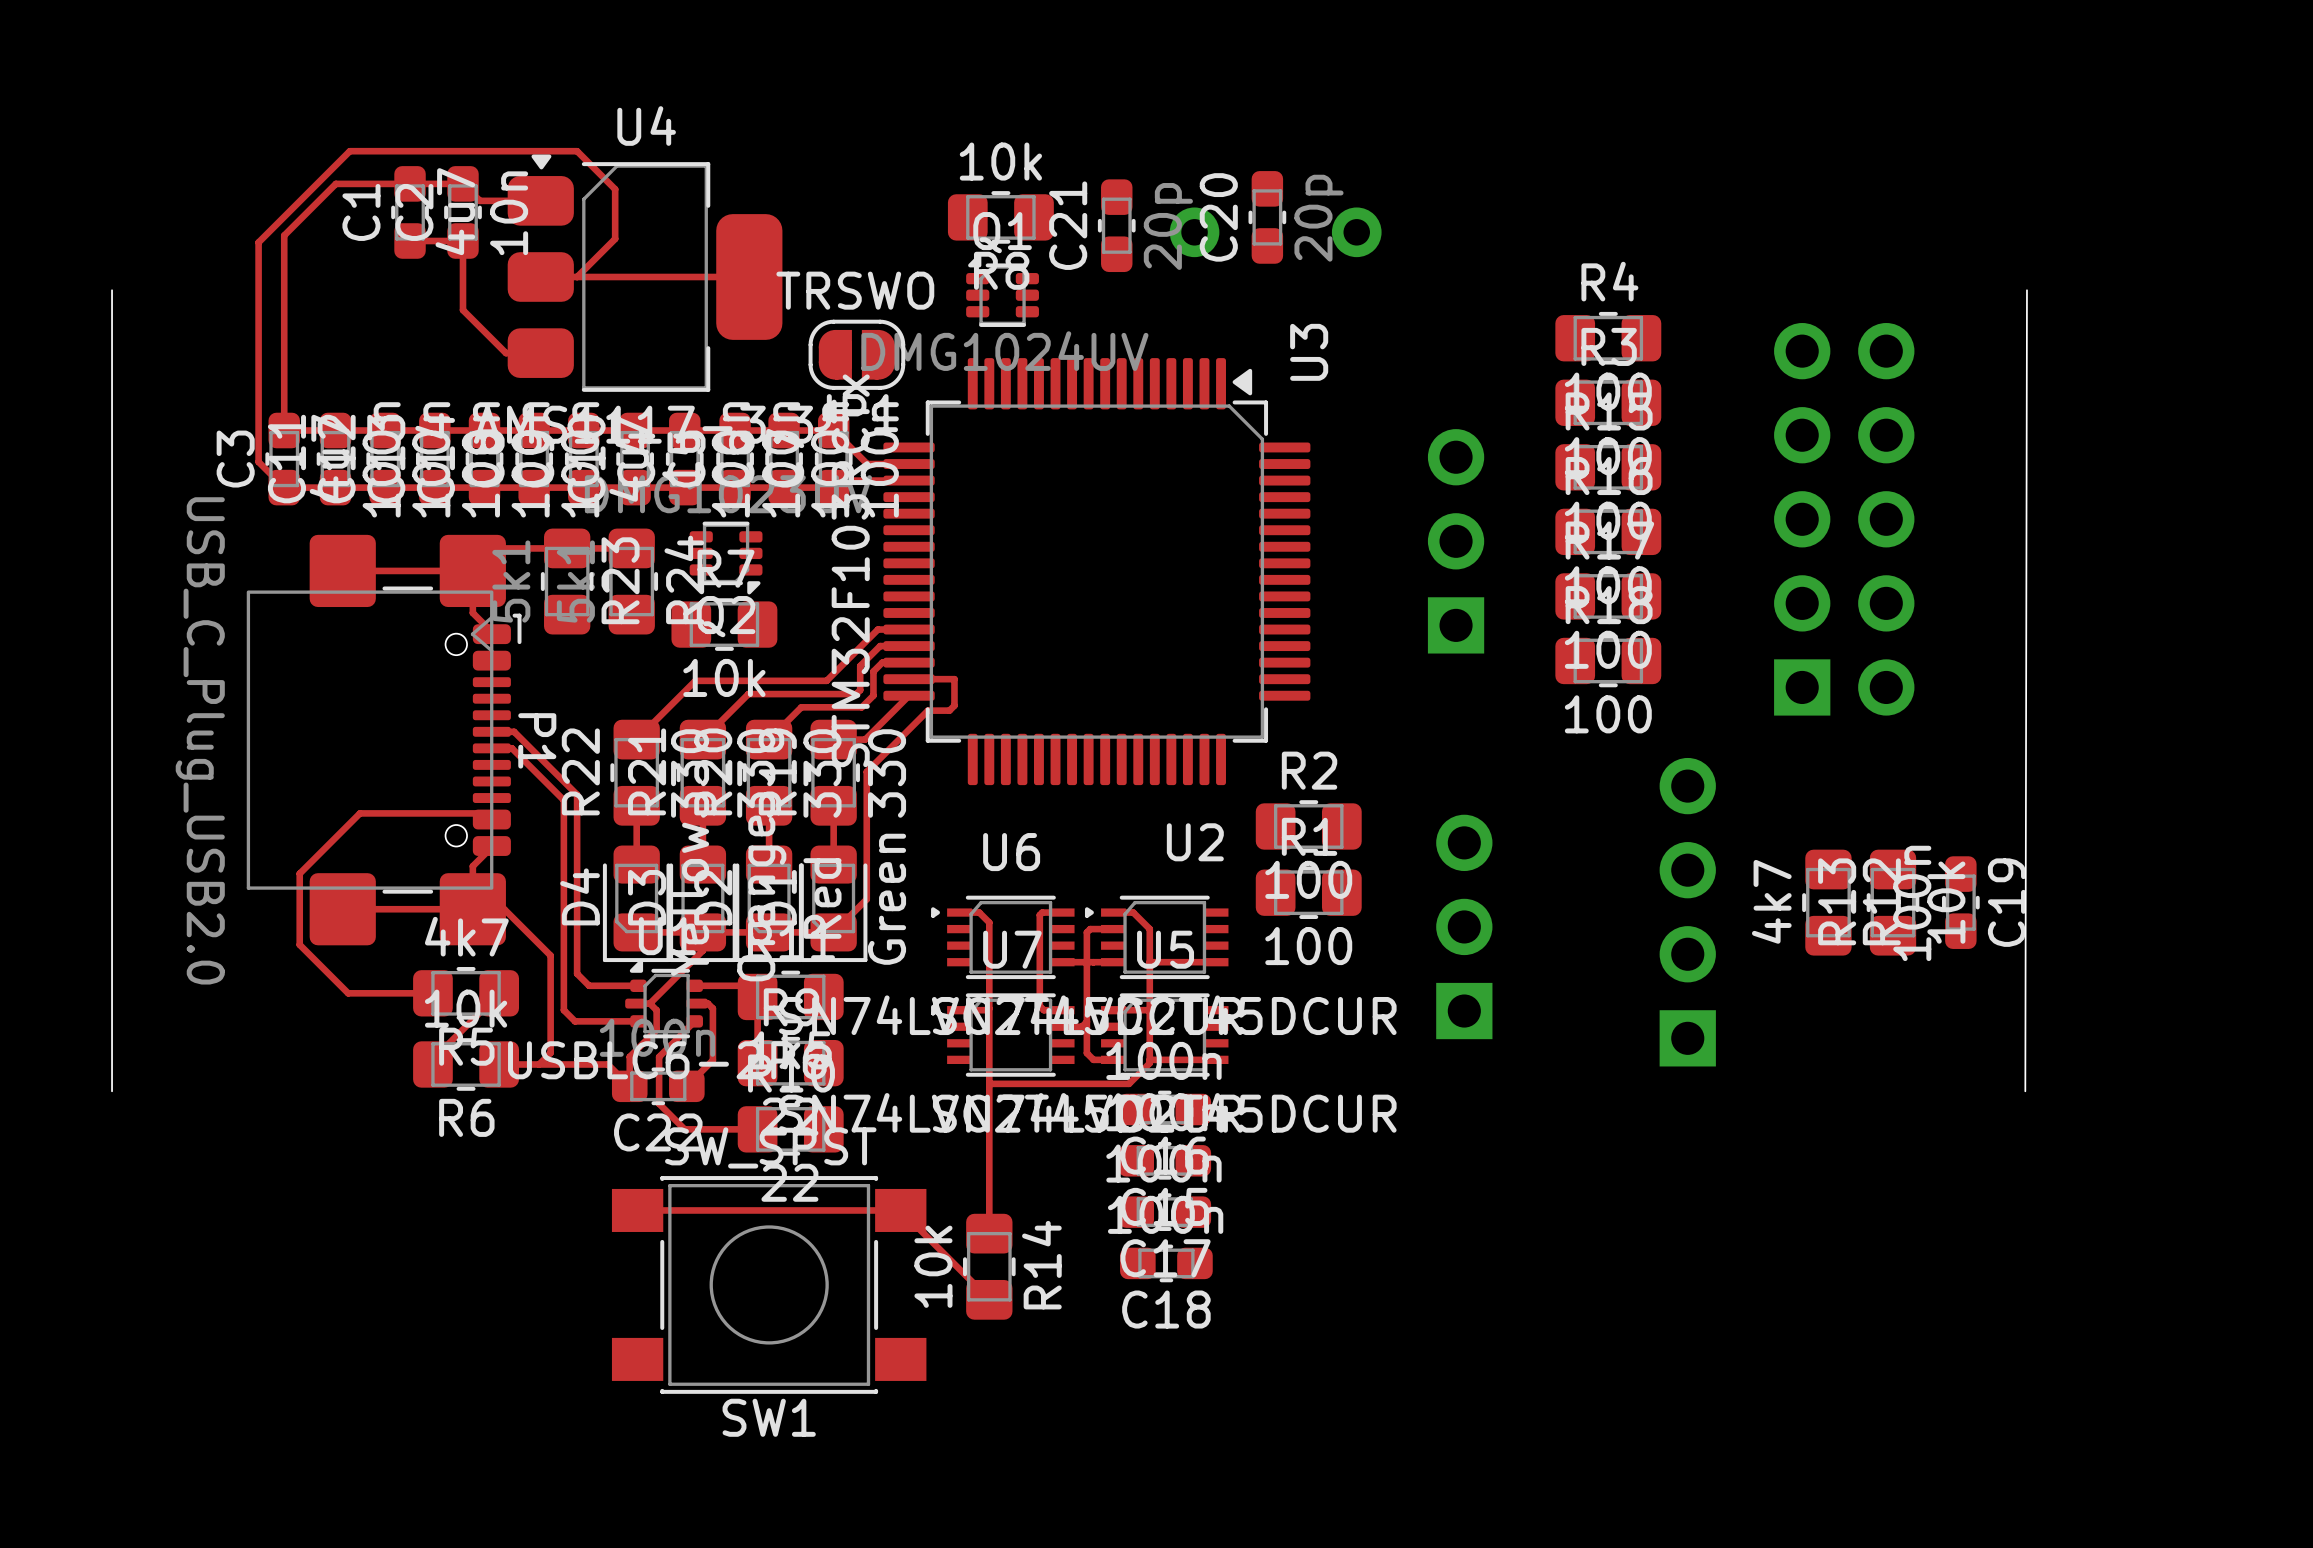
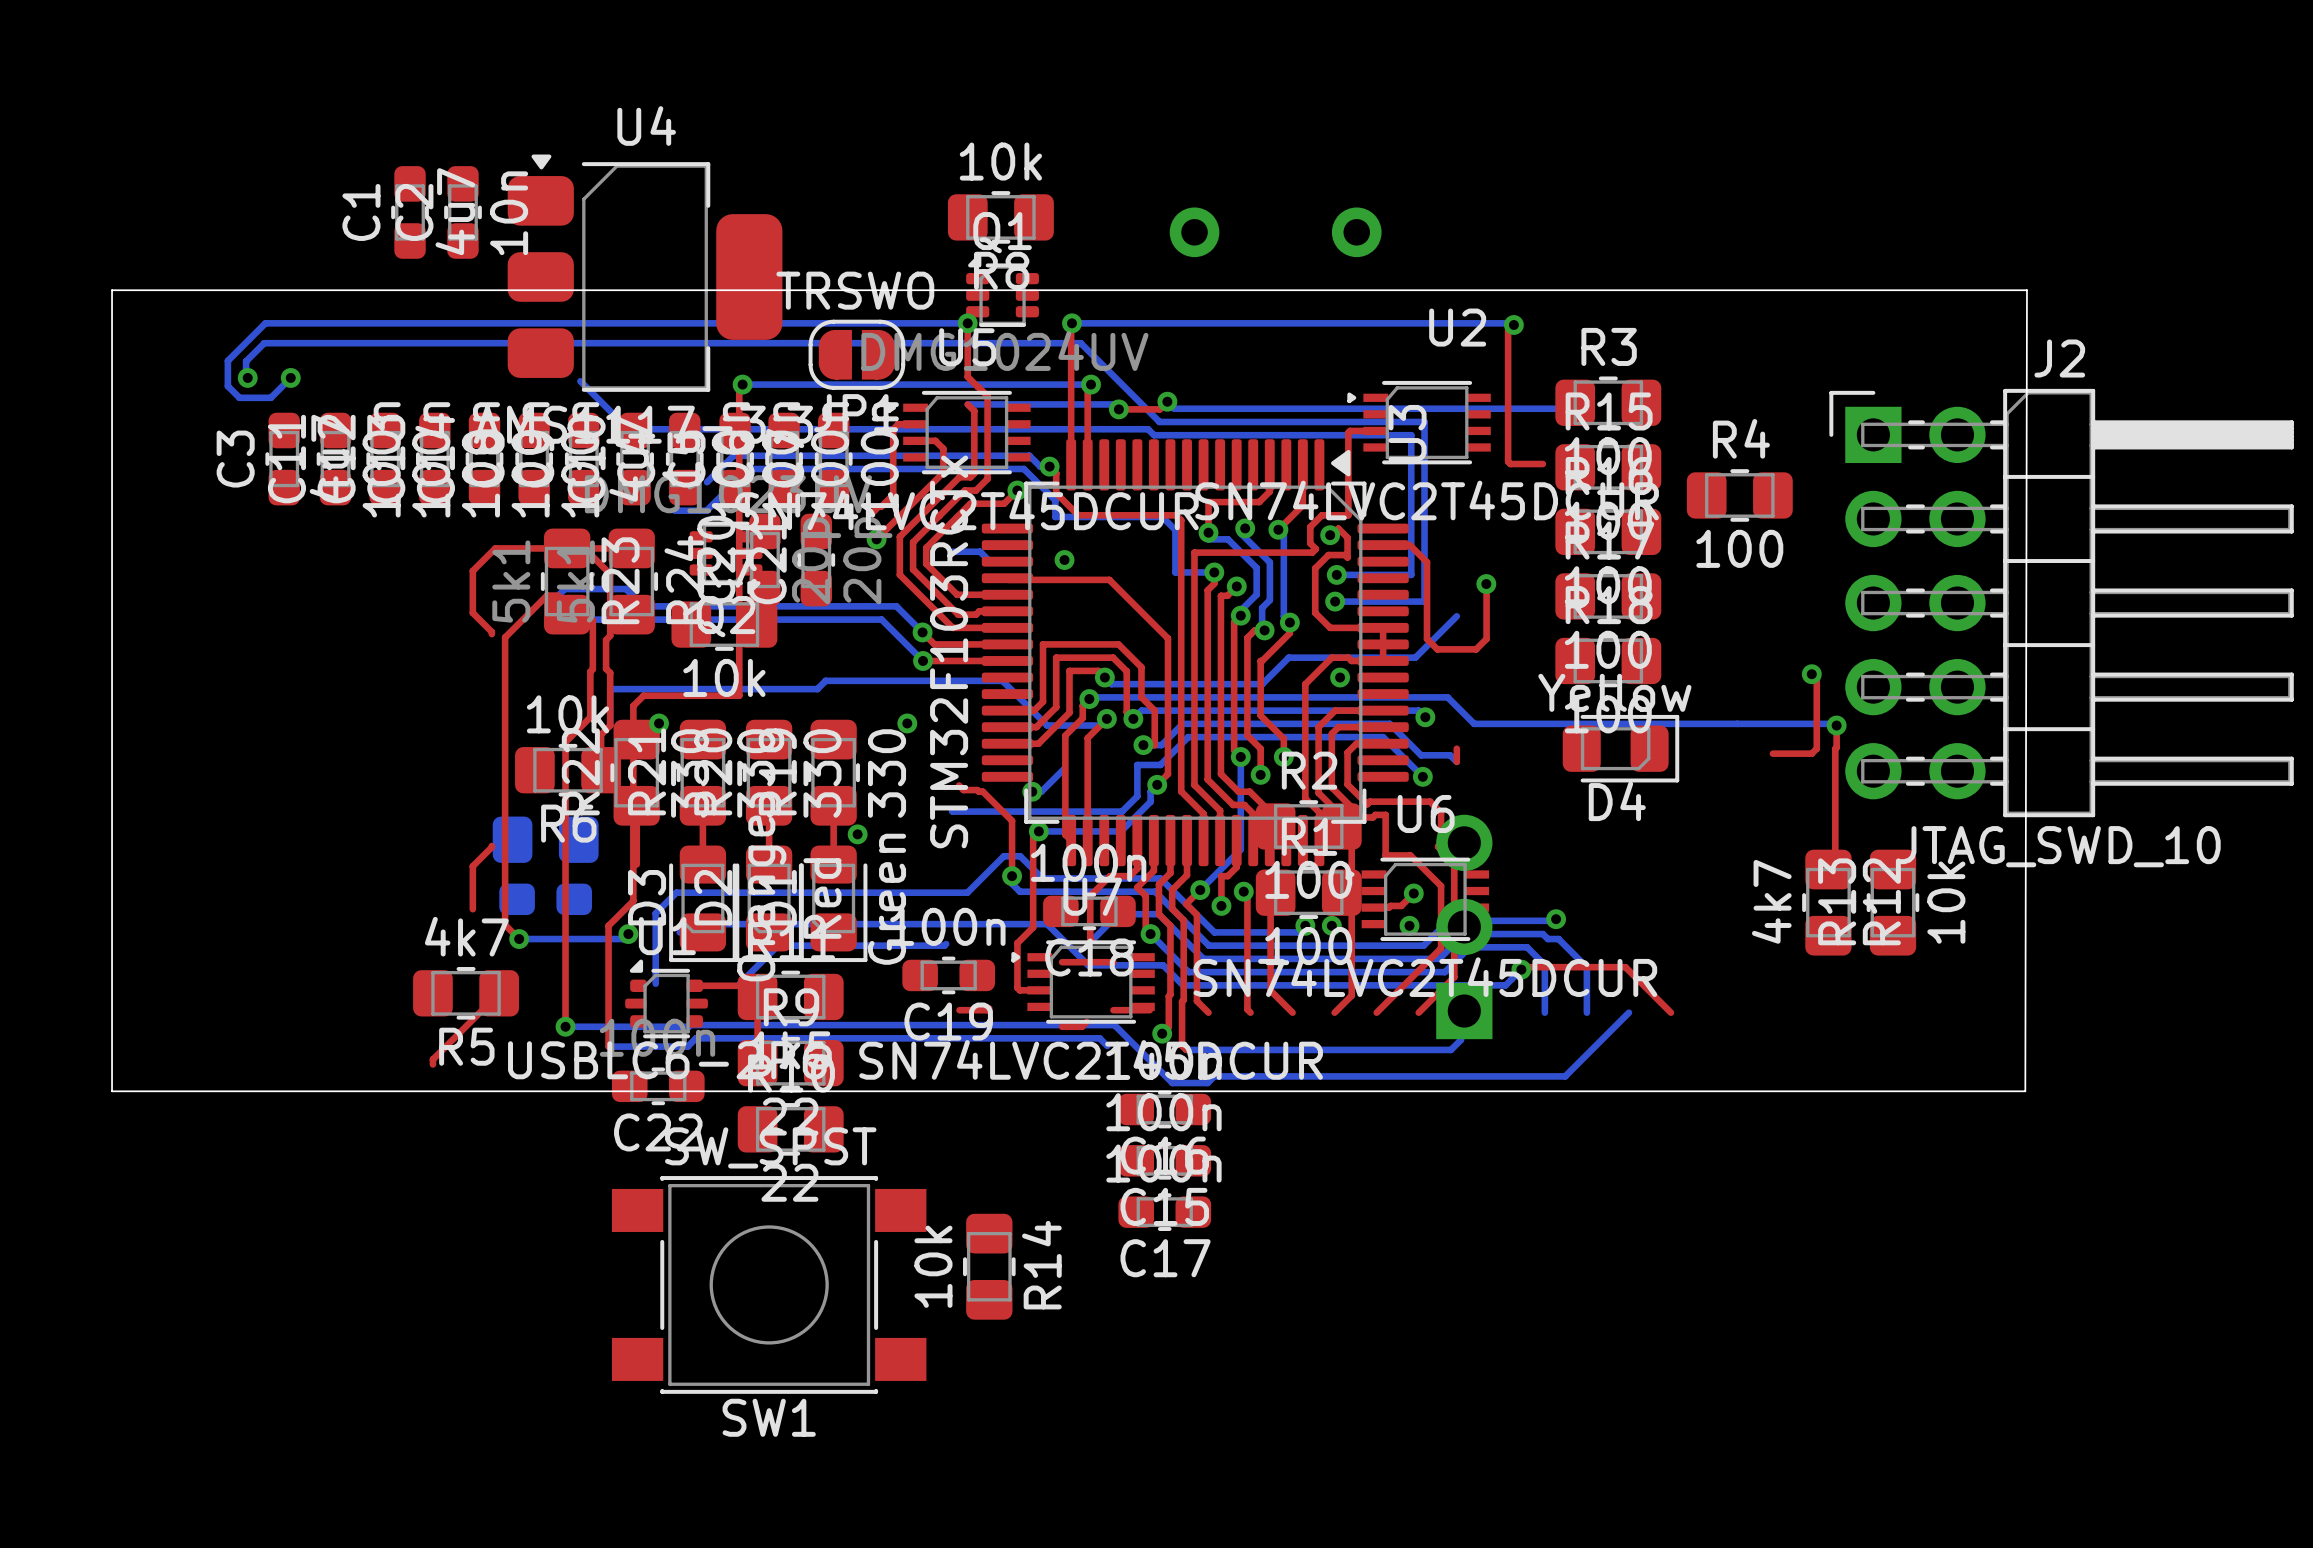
top track: (540, 200) (479, 200) (462, 183) (335, 183) (284, 235) (284, 430) (833, 430) (867, 464) (909, 464) -> none
C20 position: (1267, 217) -> (764, 560)
C21 position: (1116, 225) -> (816, 560)
top track: (410, 240) (462, 240) (462, 310) (505, 353) (540, 353) -> none
top track: (540, 276) (749, 276) -> none
top track: (577, 276) (615, 238) (615, 189) (577, 151) (349, 151) (258, 242) (258, 461) (284, 487) (833, 487) (840, 480) (909, 480) -> none
board edge: none -> (112, 290) (2026, 290)
top track: none -> (967, 323) (967, 376) (977, 387)
bottom track: none -> (967, 323) (265, 323) (227, 360) (227, 386) (239, 397) (270, 397) (290, 377)
via: none -> (967, 323)
top track: none -> (1071, 323) (1071, 464)
bottom track: none -> (1071, 323) (1512, 323) (1513, 324)
via: none -> (1071, 323)
top track: none -> (1513, 324) (1508, 330) (1508, 461) (1510, 464) (1542, 464)
via: none -> (1513, 324)
R4 position: (1608, 338) -> (1739, 495)
bottom track: none -> (247, 377) (246, 361) (264, 343) (1080, 343) (1159, 421) (1424, 421) (1424, 601) (1335, 601)
via: none -> (247, 377)
via: none -> (290, 377)
bottom track: none -> (580, 381) (628, 429) (1148, 429) (1154, 435) (1411, 435) (1411, 574) (1336, 574)
top track: none -> (742, 384) (739, 387) (739, 695) (643, 695) (633, 705) (633, 901) (608, 925) (608, 1046)
bottom track: none -> (742, 384) (1091, 384)
via: none -> (742, 384)
top track: none -> (1091, 384) (1087, 387) (1087, 464)
via: none -> (1091, 384)
top track: none -> (978, 387) (987, 396) (987, 478) (975, 490) (964, 490) (913, 542) (913, 569) (958, 614) (975, 614) (979, 611) (1007, 611)
top track: none -> (1167, 401) (1159, 409) (1118, 409)
bottom track: none -> (1167, 401) (1174, 408) (1587, 408)
via: none -> (1167, 401)
top track: none -> (967, 404) (974, 411) (974, 473) (970, 477) (959, 477) (899, 536) (899, 574) (952, 627) (1007, 627)
bottom track: none -> (967, 404) (1113, 404) (1118, 409)
via: none -> (1118, 409)
top track: none -> (915, 424) (898, 424) (893, 429) (893, 494) (872, 513)
top track: none -> (1375, 430) (1350, 430) (1348, 432) (1348, 515) (1321, 515) (1310, 526) (1310, 543) (1315, 549) (1312, 552) (1194, 552) (1194, 785) (1220, 810) (1220, 840)
top track: none -> (915, 440) (935, 440) (943, 448) (943, 472) (876, 539)
top track: none -> (1269, 464) (1269, 491) (1259, 502) (1208, 502) (1208, 532)
top track: none -> (1302, 464) (1302, 505) (1278, 529)
top track: none -> (1049, 466) (1056, 473) (1056, 493) (1078, 515) (1176, 515) (1181, 520) (1181, 791) (1203, 813) (1203, 840)
bottom track: none -> (1049, 466) (1040, 466) (1029, 455) (733, 455) (707, 482)
via: none -> (1049, 466)
top track: none -> (1017, 490) (1004, 503) (970, 503) (926, 547) (926, 563) (957, 594) (1007, 594)
via: none -> (1017, 490)
bottom track: none -> (674, 510) (706, 510) (748, 468) (1023, 468) (1055, 500) (1055, 516) (1162, 516) (1175, 530) (1175, 572) (1214, 572)
J2 side: bottom (1844, 519) -> top (2061, 603)
bottom track: none -> (1245, 528) (1240, 533) (1269, 562) (1269, 600) (1262, 607) (1262, 627) (1264, 630)
via: none -> (1245, 528)
bottom track: none -> (1278, 529) (1283, 535) (1283, 616) (1289, 622)
via: none -> (1278, 529)
bottom track: none -> (1208, 532) (1208, 539) (1228, 539) (1256, 567) (1256, 594) (1240, 610) (1240, 615)
via: none -> (1208, 532)
top track: none -> (1330, 535) (1338, 528) (1347, 537) (1347, 557) (1345, 555) (1328, 555) (1315, 568) (1315, 612) (1330, 627) (1383, 627) (1383, 660) (1351, 660) (1348, 657) (1331, 657) (1305, 684) (1305, 798) (1319, 812) (1319, 840)
via: none -> (1330, 535)
via: none -> (876, 539)
part: (1456, 541) -> none
top track: none -> (1383, 545) (1409, 545) (1427, 562) (1427, 638) (1437, 649) (1476, 649) (1486, 638) (1486, 584)
top track: none -> (582, 546) (610, 574) (610, 635) (606, 639) (606, 668) (610, 672) (610, 725) (601, 734) (601, 770)
bottom track: none -> (952, 551) (980, 551) (988, 560)
via: none -> (1064, 560)
top track: (342, 570) (472, 570) -> none
U3 position: (1096, 571) -> (1195, 652)
top track: none -> (1214, 572) (1214, 583) (1207, 590) (1207, 779) (1233, 804) (1244, 804) (1253, 813) (1253, 840)
via: none -> (1214, 572)
via: none -> (1336, 574)
top track: none -> (1007, 578) (1009, 579) (1109, 579) (1167, 638) (1167, 774) (1157, 784)
via: none -> (1486, 584)
top track: none -> (1236, 586) (1227, 595) (1220, 595) (1220, 774) (1238, 791) (1249, 791) (1269, 811) (1269, 840)
via: none -> (1236, 586)
top track: none -> (558, 595) (547, 595) (505, 637) (505, 924) (519, 939)
bottom track: none -> (558, 595) (564, 589) (625, 589) (643, 606) (896, 606) (922, 632)
via: none -> (1335, 601)
top track: none -> (581, 608) (592, 620) (592, 669) (590, 671) (590, 717) (565, 742) (565, 1026)
bottom track: none -> (581, 608) (591, 619) (881, 619) (923, 660)
top track: none -> (1240, 615) (1234, 622) (1234, 750) (1240, 756)
via: none -> (1240, 615)
bottom track: none -> (1456, 616) (1415, 657) (1288, 657) (1262, 684) (1111, 684) (1104, 677)
top track: none -> (1289, 622) (1289, 633) (1260, 660) (1260, 715) (1283, 738) (1283, 756)
via: none -> (1289, 622)
top track: (909, 629) (877, 629) (826, 680) (695, 680) (636, 739) -> none
top track: none -> (1264, 630) (1254, 630) (1247, 637) (1247, 735) (1260, 748) (1260, 774)
via: none -> (1264, 630)
top track: none -> (922, 632) (934, 644) (1007, 644)
via: none -> (922, 632)
top track: (909, 646) (880, 646) (860, 666) (860, 690) (856, 694) (748, 694) (702, 739) -> none
top track: none -> (923, 660) (1007, 660)
via: none -> (923, 660)
top track: (909, 662) (882, 662) (873, 671) (873, 695) (861, 707) (801, 707) (769, 739) -> none
top track: none -> (1811, 674) (1816, 679) (1816, 748) (1811, 753) (1772, 753)
via: none -> (1811, 674)
top track: none -> (1104, 677) (1098, 670) (1069, 670) (1069, 712) (1038, 743) (1007, 743)
via: none -> (1104, 677)
via: none -> (1340, 677)
top track: (909, 679) (954, 679) (954, 705) (949, 710) (927, 710) (866, 771) (866, 899) (833, 932) (636, 932) -> none
top track: (909, 695) (865, 739) (833, 739) -> none
top track: none -> (1089, 699) (1082, 705) (1082, 718) (1065, 735) (1065, 834) (1071, 840)
bottom track: none -> (1089, 699) (1091, 697) (1447, 697) (1474, 723) (1834, 723) (1836, 725)
via: none -> (1089, 699)
top track: none -> (1007, 710) (1034, 710) (1043, 701) (1043, 644) (1118, 644) (1141, 667) (1141, 697) (1154, 710) (1154, 744)
top track: none -> (1383, 710) (1335, 710) (1318, 727) (1318, 793) (1356, 831) (1351, 836) (1351, 995) (1334, 1012)
bottom track: none -> (1425, 717) (1418, 710) (1141, 710) (1133, 718)
via: none -> (1425, 717)
top track: none -> (1106, 718) (1087, 738) (1087, 840)
bottom track: none -> (1106, 718) (1100, 725) (1047, 725) (1002, 680) (825, 680) (817, 689) (610, 689) (610, 725)
via: none -> (1106, 718)
top track: none -> (1133, 718) (1126, 712) (1126, 671) (1113, 657) (1056, 657) (1056, 707) (1036, 727) (1007, 727)
via: none -> (1133, 718)
via: none -> (659, 723)
via: none -> (907, 723)
top track: none -> (1836, 725) (1835, 875) (1839, 879)
via: none -> (1836, 725)
top track: none -> (1383, 727) (1338, 727) (1331, 733) (1331, 787) (1361, 817) (1385, 814) (1385, 855) (1410, 855) (1441, 886) (1441, 948) (1376, 1012)
top track: (491, 731) (514, 731) (577, 794) (577, 973) (589, 985) (638, 985) -> none
P1: USB_C_Plug_USB2.0 (384, 740) -> none
top track: none -> (1383, 743) (1356, 743) (1347, 752) (1347, 784) (1367, 804) (1369, 801) (1430, 801) (1441, 812) (1441, 843) (1438, 846) (1454, 862) (1454, 977) (1418, 1012)
bottom track: none -> (1143, 745) (1161, 745) (1181, 723) (1389, 723) (1421, 755) (1450, 755) (1456, 761)
via: none -> (1143, 745)
top track: (491, 748) (511, 748) (563, 800) (563, 1010) (575, 1021) (638, 1021) -> none
top track: none -> (1456, 748) (1456, 761)
bottom track: none -> (1240, 756) (1240, 849) (1200, 890)
via: none -> (1240, 756)
via: none -> (1283, 756)
bottom track: none -> (1064, 768) (1041, 791) (1032, 791)
via: none -> (1260, 774)
bottom track: none -> (1422, 776) (1383, 737) (1188, 737) (1160, 764) (1137, 764) (1137, 796) (1122, 811) (952, 810)
via: none -> (1422, 776)
bottom track: none -> (1157, 784) (1150, 791) (1150, 801) (1120, 831) (1038, 831)
via: none -> (1157, 784)
top track: none -> (959, 785) (963, 790) (982, 791) (1012, 820) (1012, 876)
via: none -> (1032, 791)
top track: (491, 819) (485, 813) (359, 813) (299, 873) (299, 944) (348, 993) (432, 993) -> none
top track: none -> (1038, 831) (1033, 837) (1033, 927) (1017, 943) (1017, 987) (1019, 990) (1039, 990)
via: none -> (1038, 831)
via: none -> (857, 834)
part: none -> (545, 839)
top track: none -> (1137, 840) (1137, 868) (1129, 876) (1110, 876) (1090, 895) (1090, 939) (1091, 940)
top track: none -> (1153, 840) (1153, 870) (1137, 887) (1145, 895) (1145, 929) (1150, 934)
top track: none -> (1170, 840) (1170, 873) (1158, 884) (1158, 914) (1170, 925) (1168, 1027) (1162, 1033)
top track: none -> (1187, 840) (1187, 875) (1172, 890) (1172, 908) (1183, 920) (1182, 1045) (1186, 1049)
top track: none -> (1236, 840) (1236, 867) (1227, 876) (1221, 876) (1221, 905)
bottom track: none -> (1012, 876) (1012, 883) (1020, 891) (1155, 891) (1209, 945) (1423, 945) (1448, 920) (1554, 920) (1556, 919)
via: none -> (1012, 876)
top track: none -> (1200, 890) (1186, 904) (1196, 914) (1196, 1001) (1208, 1012)
via: none -> (1200, 890)
top track: none -> (1243, 891) (1247, 895) (1247, 1009) (1250, 1012)
via: none -> (1243, 891)
top track: none -> (1413, 893) (1401, 905) (1374, 907)
via: none -> (1413, 893)
top track: none -> (1273, 896) (1270, 899) (1270, 990) (1292, 1012)
part: none -> (545, 899)
C19 rotation: 0° (1960, 902) -> 90° clockwise (948, 975)
C19 position: (1960, 902) -> (948, 975)
D4 rotation: 0° (636, 903) -> 90° counterclockwise (1620, 748)
D4 position: (636, 903) -> (1620, 748)
via: none -> (1221, 905)
top track: (342, 909) (504, 909) (550, 955) (550, 1052) (539, 1064) -> none
top track: (959, 912) (979, 912) (989, 922) (989, 1233) -> none
top track: (1062, 912) (1042, 912) (1039, 915) (1039, 1006) (1043, 1010) (1062, 1010) -> none
top track: (1113, 912) (1133, 912) (1149, 929) (1149, 1063) (1129, 1083) (989, 1083) -> none
part: (1687, 912) -> none
via: none -> (1556, 919)
bottom track: none -> (1305, 925) (1298, 932) (1214, 932) (1160, 878) (1042, 878) (1020, 856) (1003, 856) (967, 892) (676, 892) (655, 913) (655, 983)
via: none -> (1305, 925)
via: none -> (1331, 925)
via: none -> (1409, 925)
top track: (1113, 929) (1090, 929) (1086, 932) (1086, 1053) (1093, 1059) (1113, 1059) -> none
bottom track: none -> (679, 932) (688, 924) (1047, 924) (1088, 965) (1163, 965) (1183, 985) (1505, 985) (1521, 969)
top track: (702, 932) (702, 950) (649, 1003) -> none
bottom track: none -> (628, 934) (623, 939) (519, 939)
via: none -> (628, 934)
bottom track: none -> (1150, 934) (1188, 972) (1444, 972) (1469, 947) (1527, 947) (1544, 965) (1544, 1012)
via: none -> (1150, 934)
U6 position: (1002, 937) -> (1417, 899)
U2 position: (1156, 937) -> (1419, 422)
via: none -> (519, 939)
bottom track: none -> (1091, 940) (1118, 914) (1158, 914) (1203, 958) (1439, 958) (1464, 934) (1542, 934) (1547, 939) (1558, 939) (1586, 967) (1586, 1012)
bottom track: none -> (946, 944) (944, 945) (777, 945) (739, 983)
top track: (1149, 962) (1216, 962) -> none
top track: none -> (1521, 969) (1523, 967) (1625, 967) (1670, 1012)
via: none -> (1521, 969)
top track: (649, 1003) (656, 1010) (656, 1029) (629, 1056) (629, 1086) (607, 1064) (499, 1064) -> none
top track: (697, 1003) (707, 1003) (712, 1008) (712, 1060) (686, 1086) -> none
bottom track: none -> (1460, 1012) (1460, 1039) (1451, 1049) (1186, 1049)
bottom track: none -> (1628, 1012) (1565, 1076) (1214, 1076) (1207, 1083) (1172, 1083) (1114, 1025) (565, 1026)
top track: (694, 1021) (659, 1056) (659, 1103) (684, 1129) (757, 1129) -> none
via: none -> (565, 1026)
via: none -> (1162, 1033)
U7 position: (1002, 1035) -> (1083, 982)
U5 position: (1156, 1035) -> (958, 432)
bottom track: none -> (1107, 1046) (1099, 1038) (695, 1038) (687, 1046) (608, 1046)
top track: (1149, 1059) (1216, 1059) -> none
R6 position: (466, 1064) -> (568, 770)
board edge: none -> (112, 1091) (2025, 1091)
top track: (637, 1210) (900, 1210) (989, 1299) -> none
C18 position: (1166, 1263) -> (1089, 911)

